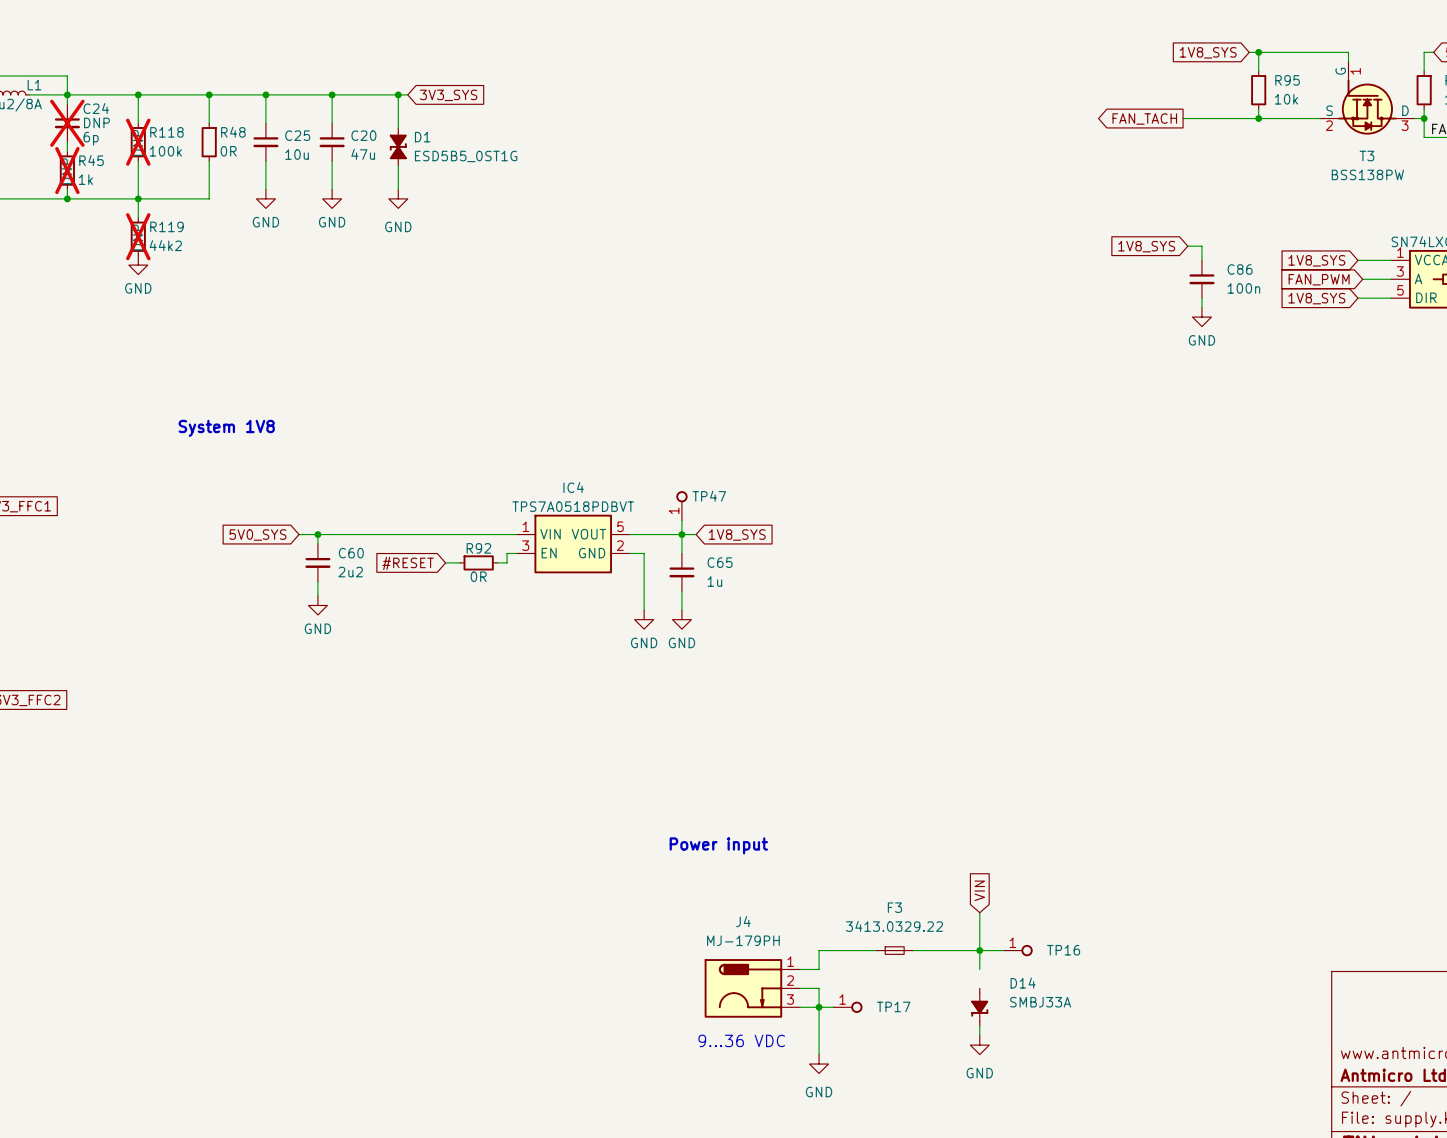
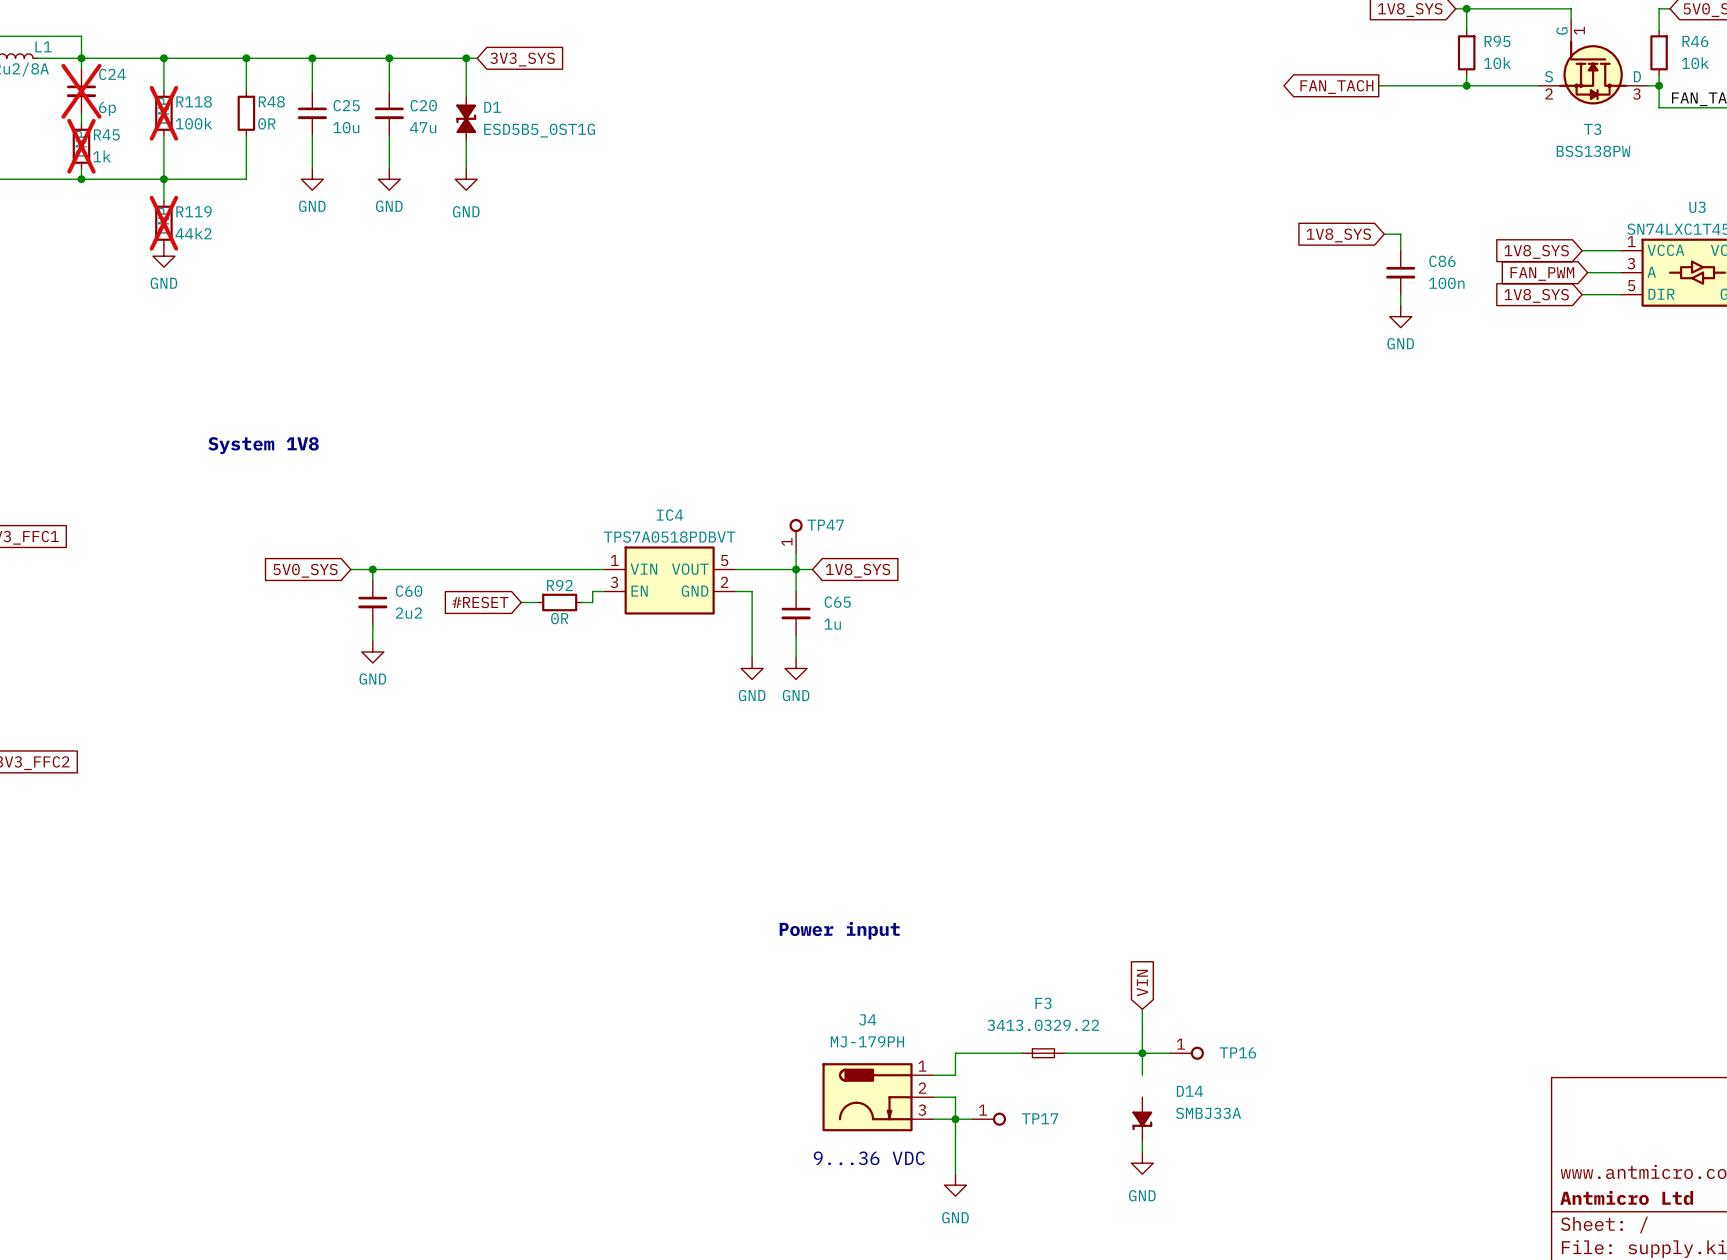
C24 text: DNP (96, 122) -> none

